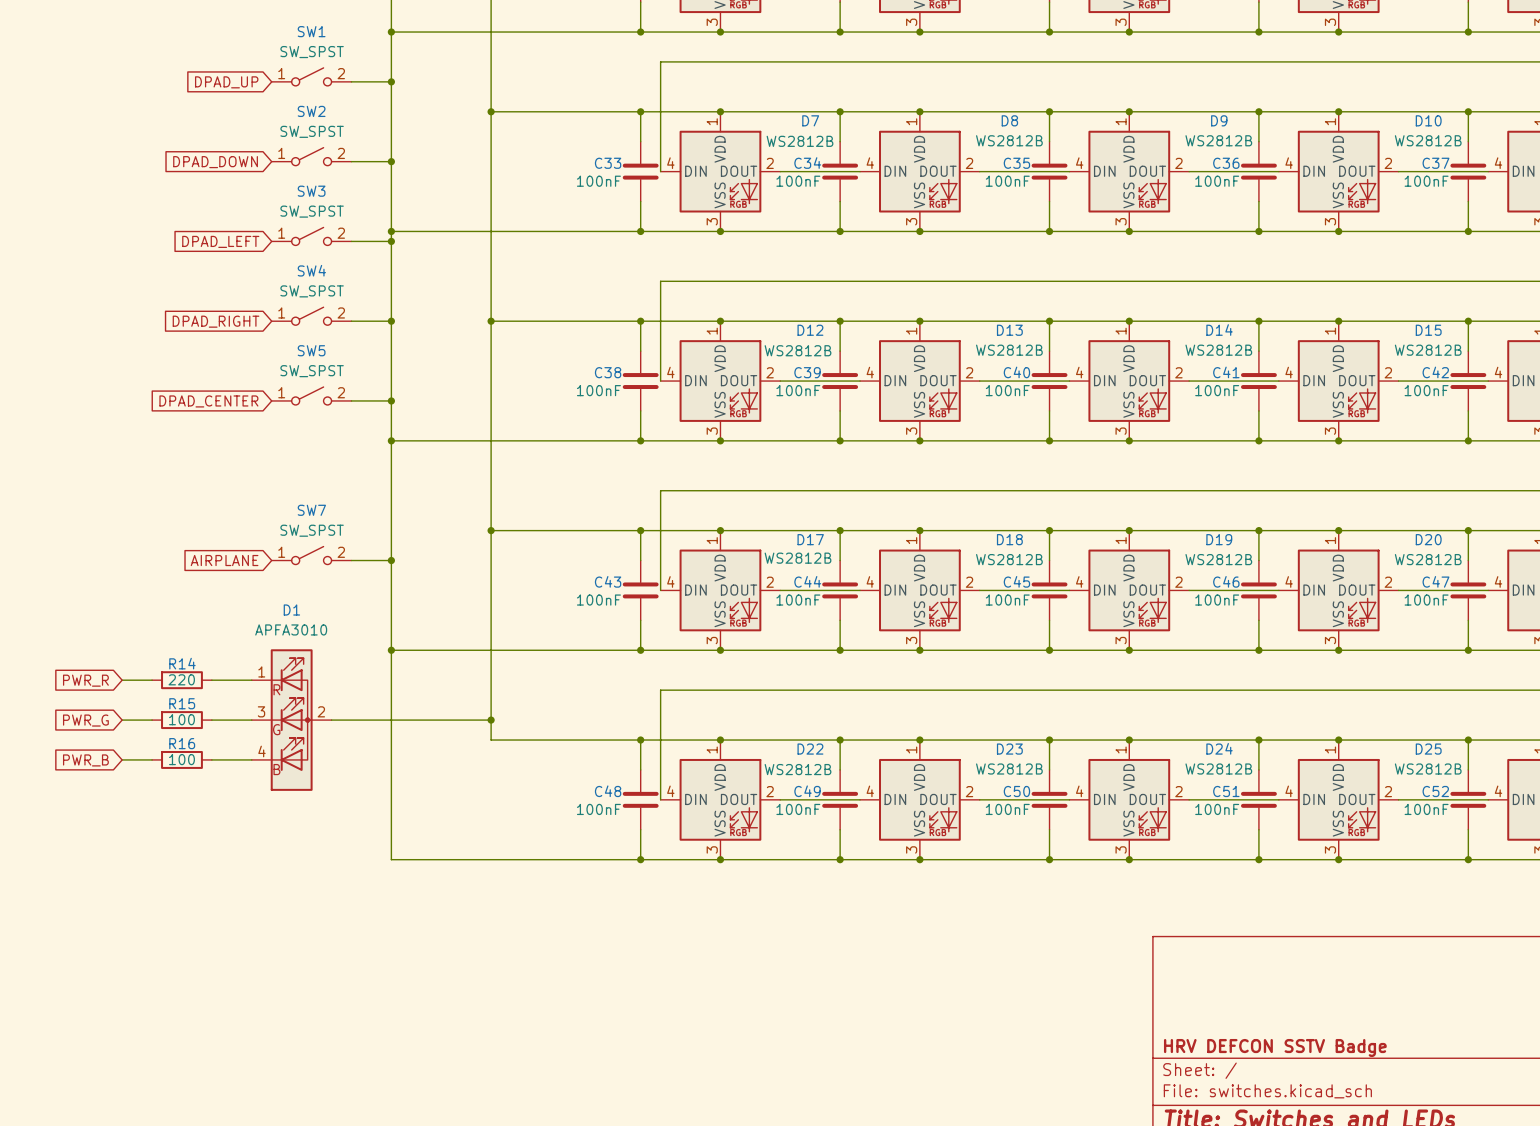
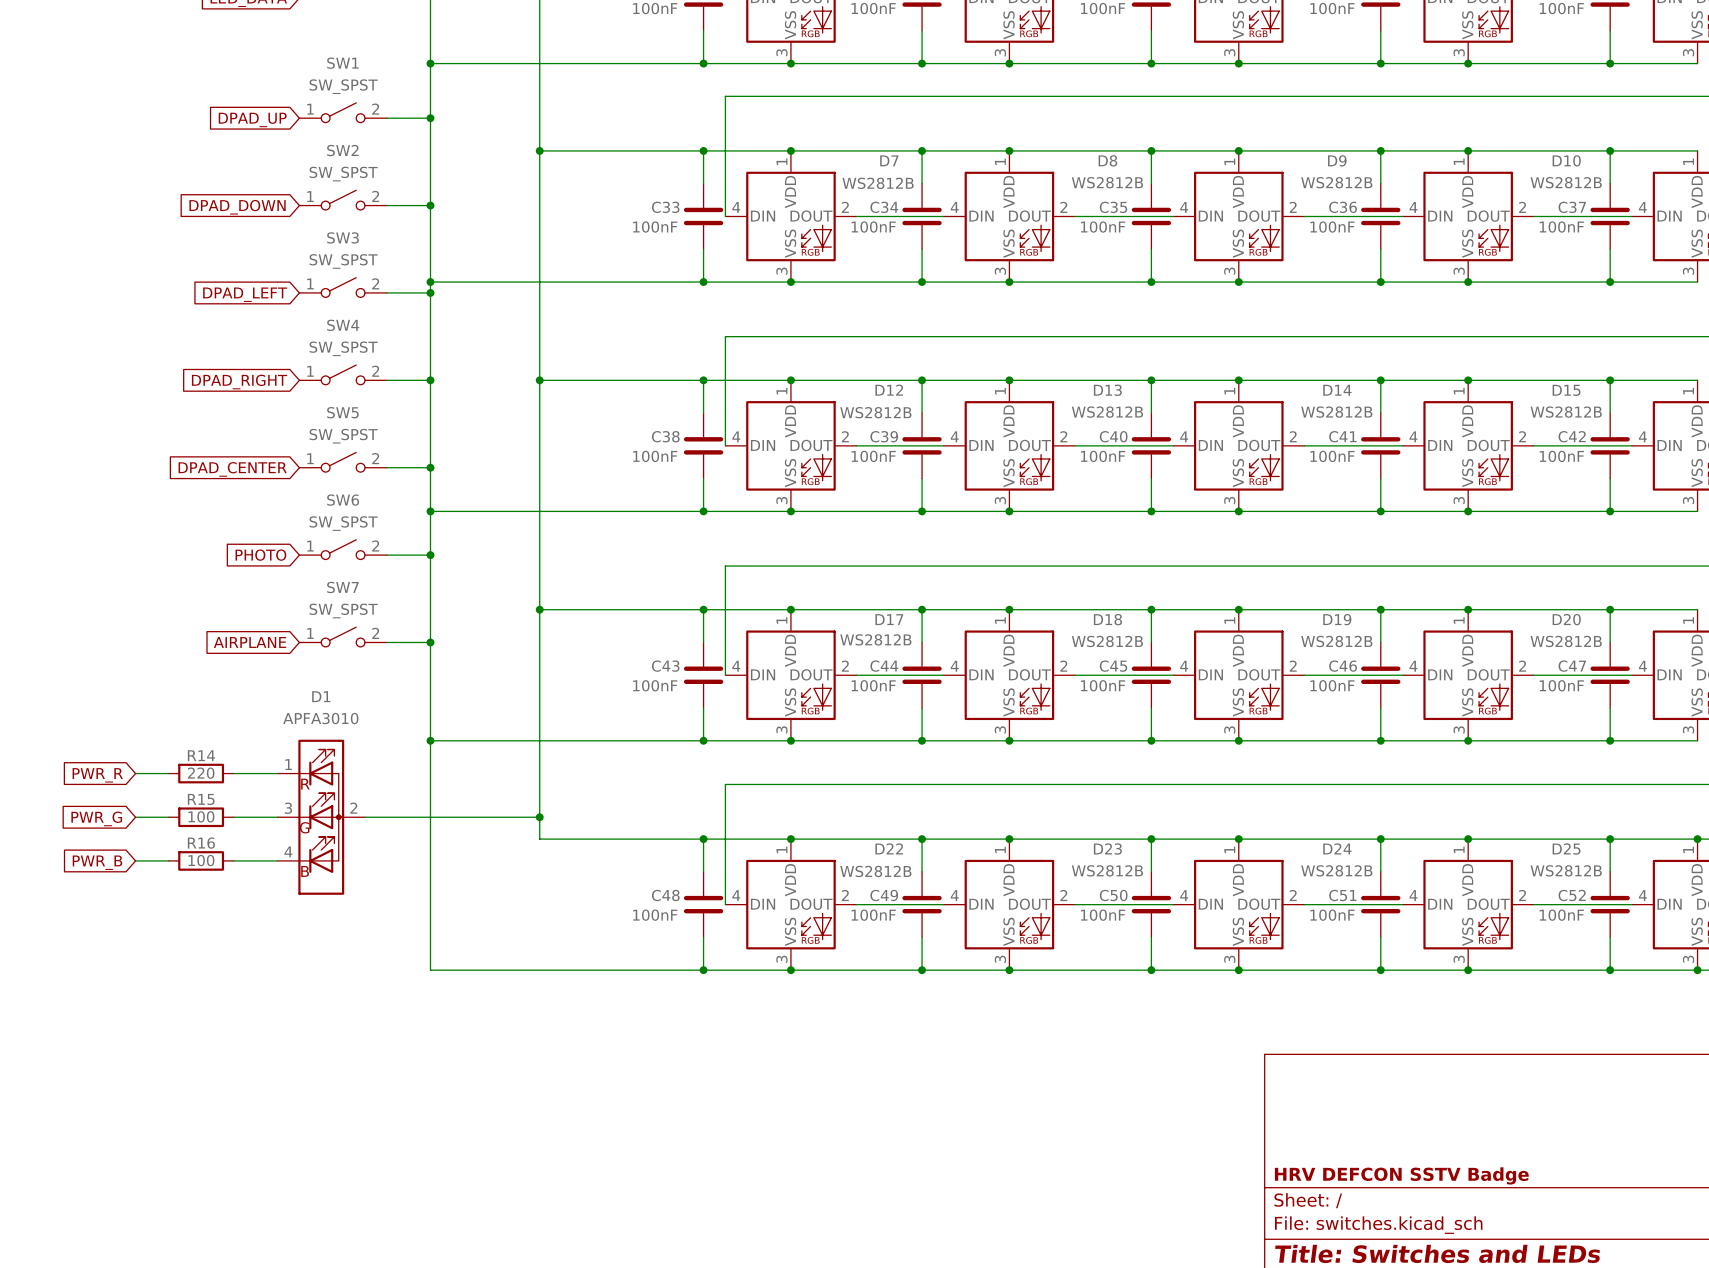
SW6: none -> SW_SPST (343, 549)
global label: none -> PHOTO (260, 555)
wire: none -> (386, 555) (430, 555)
junction: none -> (430, 555)

